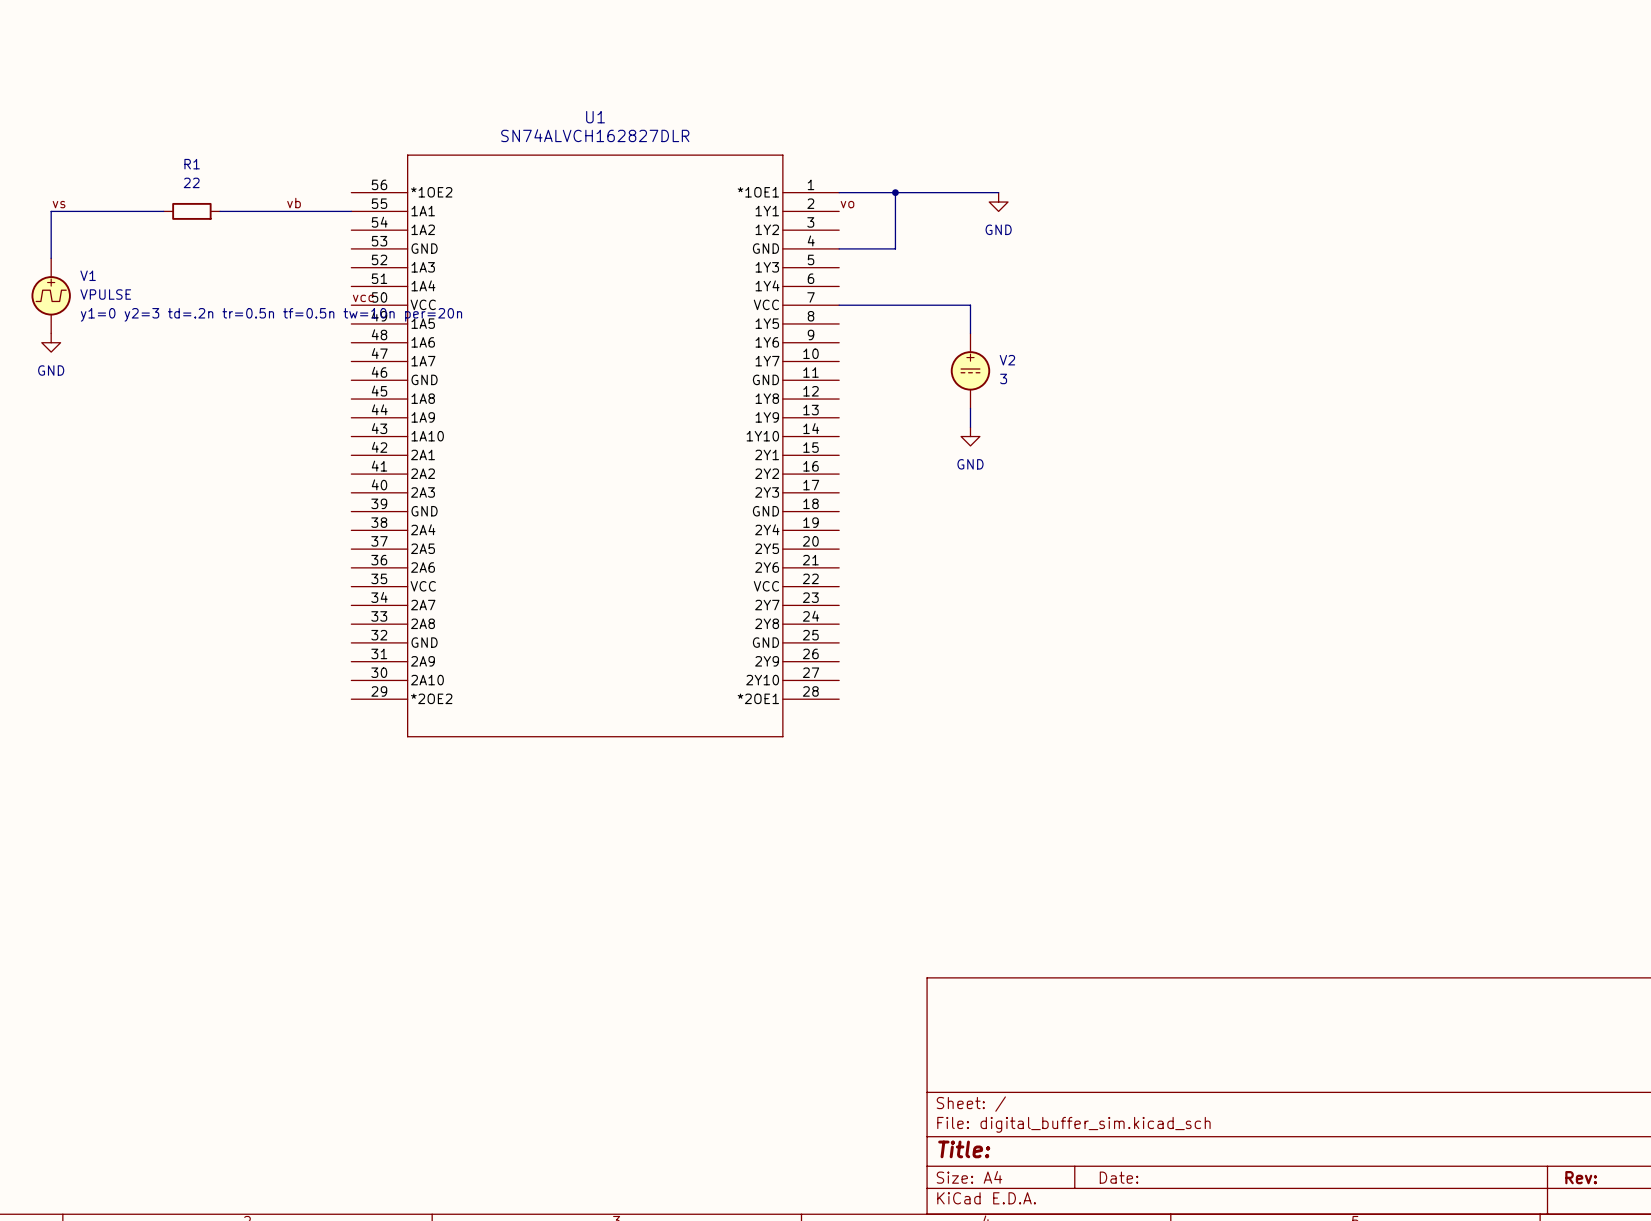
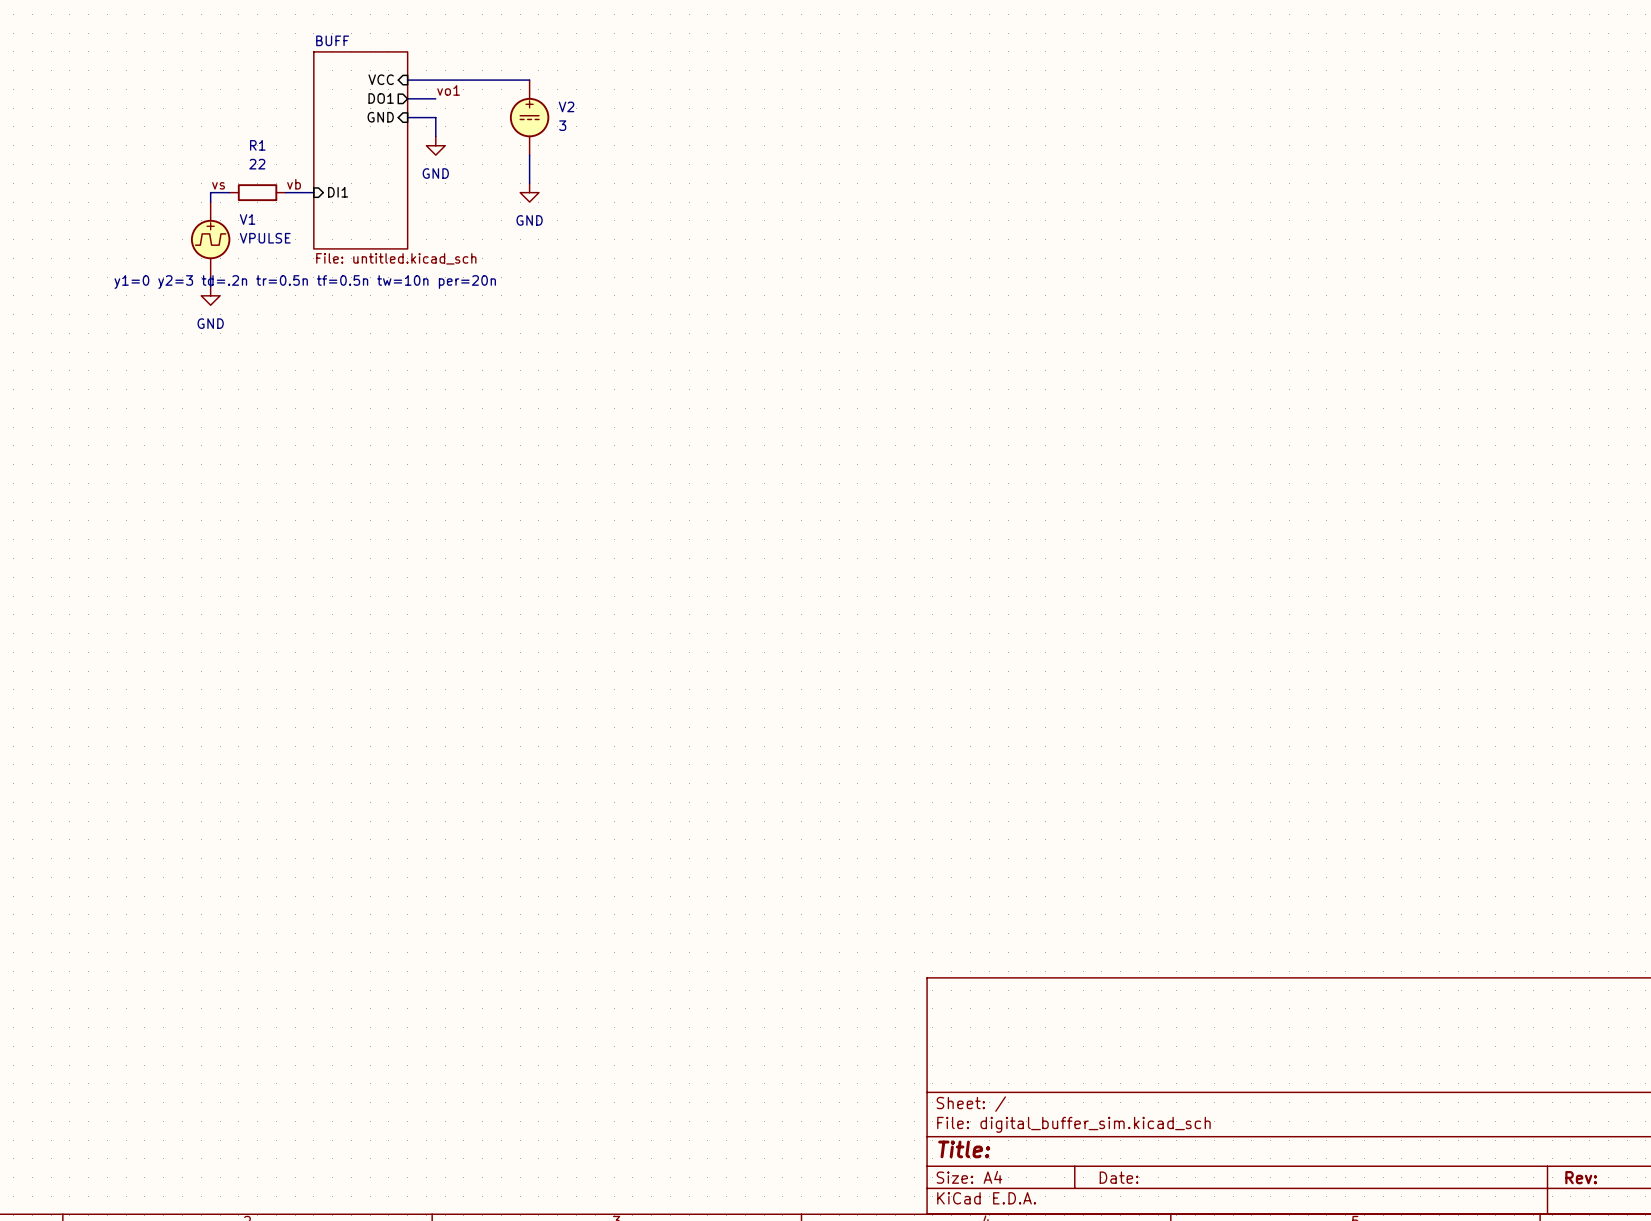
sheet pin: none -> VCC (381, 79)
wire: none -> (407, 80) (529, 80)
label: none -> vo1 (448, 90)
sheet pin: none -> DO1 (381, 98)
wire: none -> (407, 98) (435, 98)
sheet pin: none -> GND (380, 117)
wire: none -> (407, 117) (435, 117) (435, 136)
power symbol: none -> GND (435, 145)
sheet BUFF: none -> File: untitled.kicad_sch (360, 150)
wire: none -> (529, 155) (529, 183)
wire: none -> (229, 192) (210, 192) (210, 202)
wire: none -> (285, 192) (313, 192)
sheet pin: none -> DI1 (338, 192)
power symbol: none -> GND (529, 192)
wire: (839, 192) (998, 192) -> none
wire: (895, 192) (895, 248) (839, 248) -> none
junction: (895, 192) -> none
power symbol: GND (998, 202) -> none
label position: vb (294, 203) -> vb (294, 184)
label position: vs (59, 204) -> vs (218, 185)
label: vo (847, 204) -> none
wire: (163, 211) (51, 211) (51, 258) -> none
R1 position: (191, 211) -> (257, 192)
wire: (220, 211) (351, 211) -> none
wire: none -> (210, 277) (210, 286)
V1 position: (51, 295) -> (210, 239)
label: vcc (363, 298) -> none
wire: (839, 305) (970, 305) (970, 333) -> none
V1 text position: y1=0 y2=3 td=.2n tr=0.5n tf=0.5n tw=10n per=20n (271, 314) -> y1=0 y2=3 td=.2n tr=0.5n tf=0.5n tw=10n per=20n (305, 282)
power symbol position: GND (51, 342) -> GND (210, 295)
V2 position: (970, 370) -> (529, 117)
wire: (970, 408) (970, 427) -> none
power symbol: GND (970, 436) -> none
U1: SN74ALVCH162827DLR (595, 445) -> none

